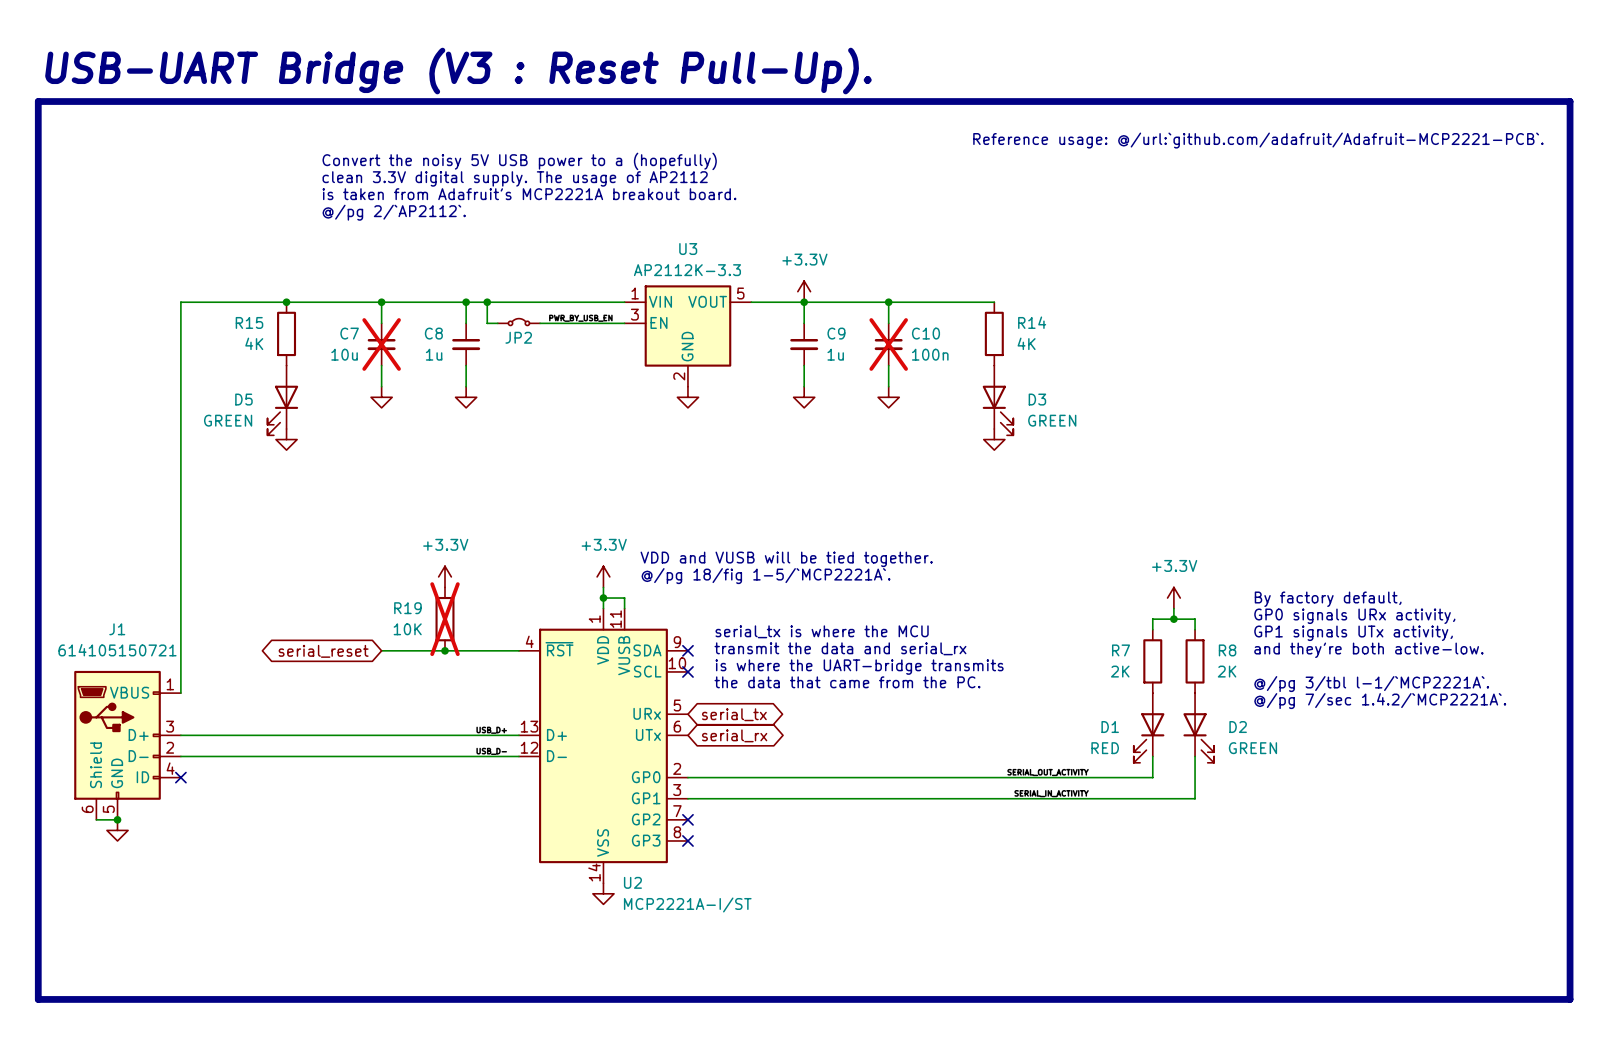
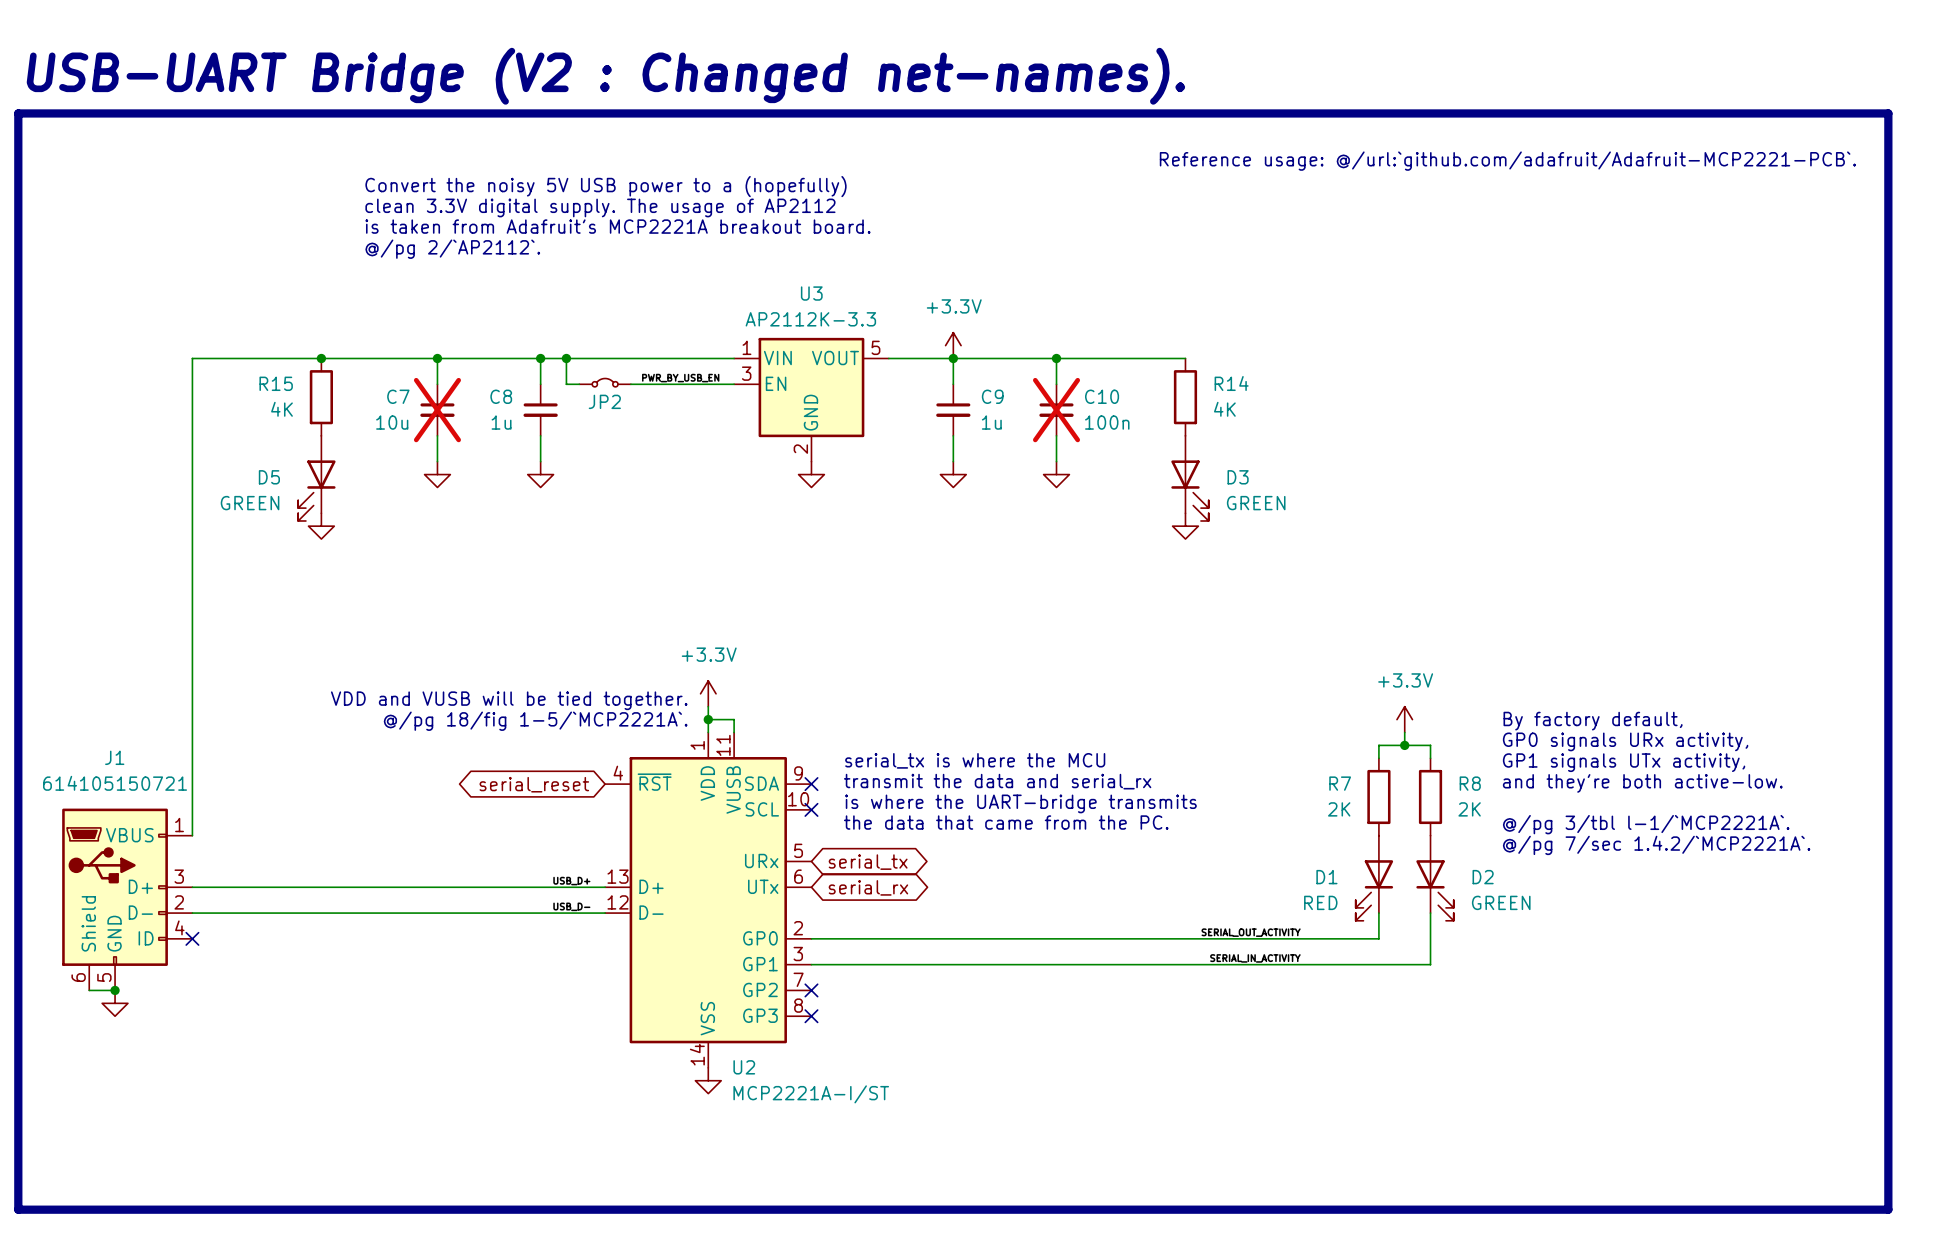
text: USB-UART Bridge (V3 : Reset Pull-Up). (458, 71) -> USB-UART Bridge (V2 : Changed net-names). (605, 76)
text position: VDD and VUSB will be tied together. (786, 559) -> VDD and VUSB will be tied together. (509, 700)
power symbol: +3.3V (445, 576) -> none
text position: @/pg 18/fig 1-5/`MCP2221A`. (766, 576) -> @/pg 18/fig 1-5/`MCP2221A`. (535, 721)
R19: 10K (445, 619) -> none
wire: (381, 650) (518, 650) -> none
junction: (445, 650) -> none
global label position: serial_reset (323, 651) -> serial_reset (534, 784)

